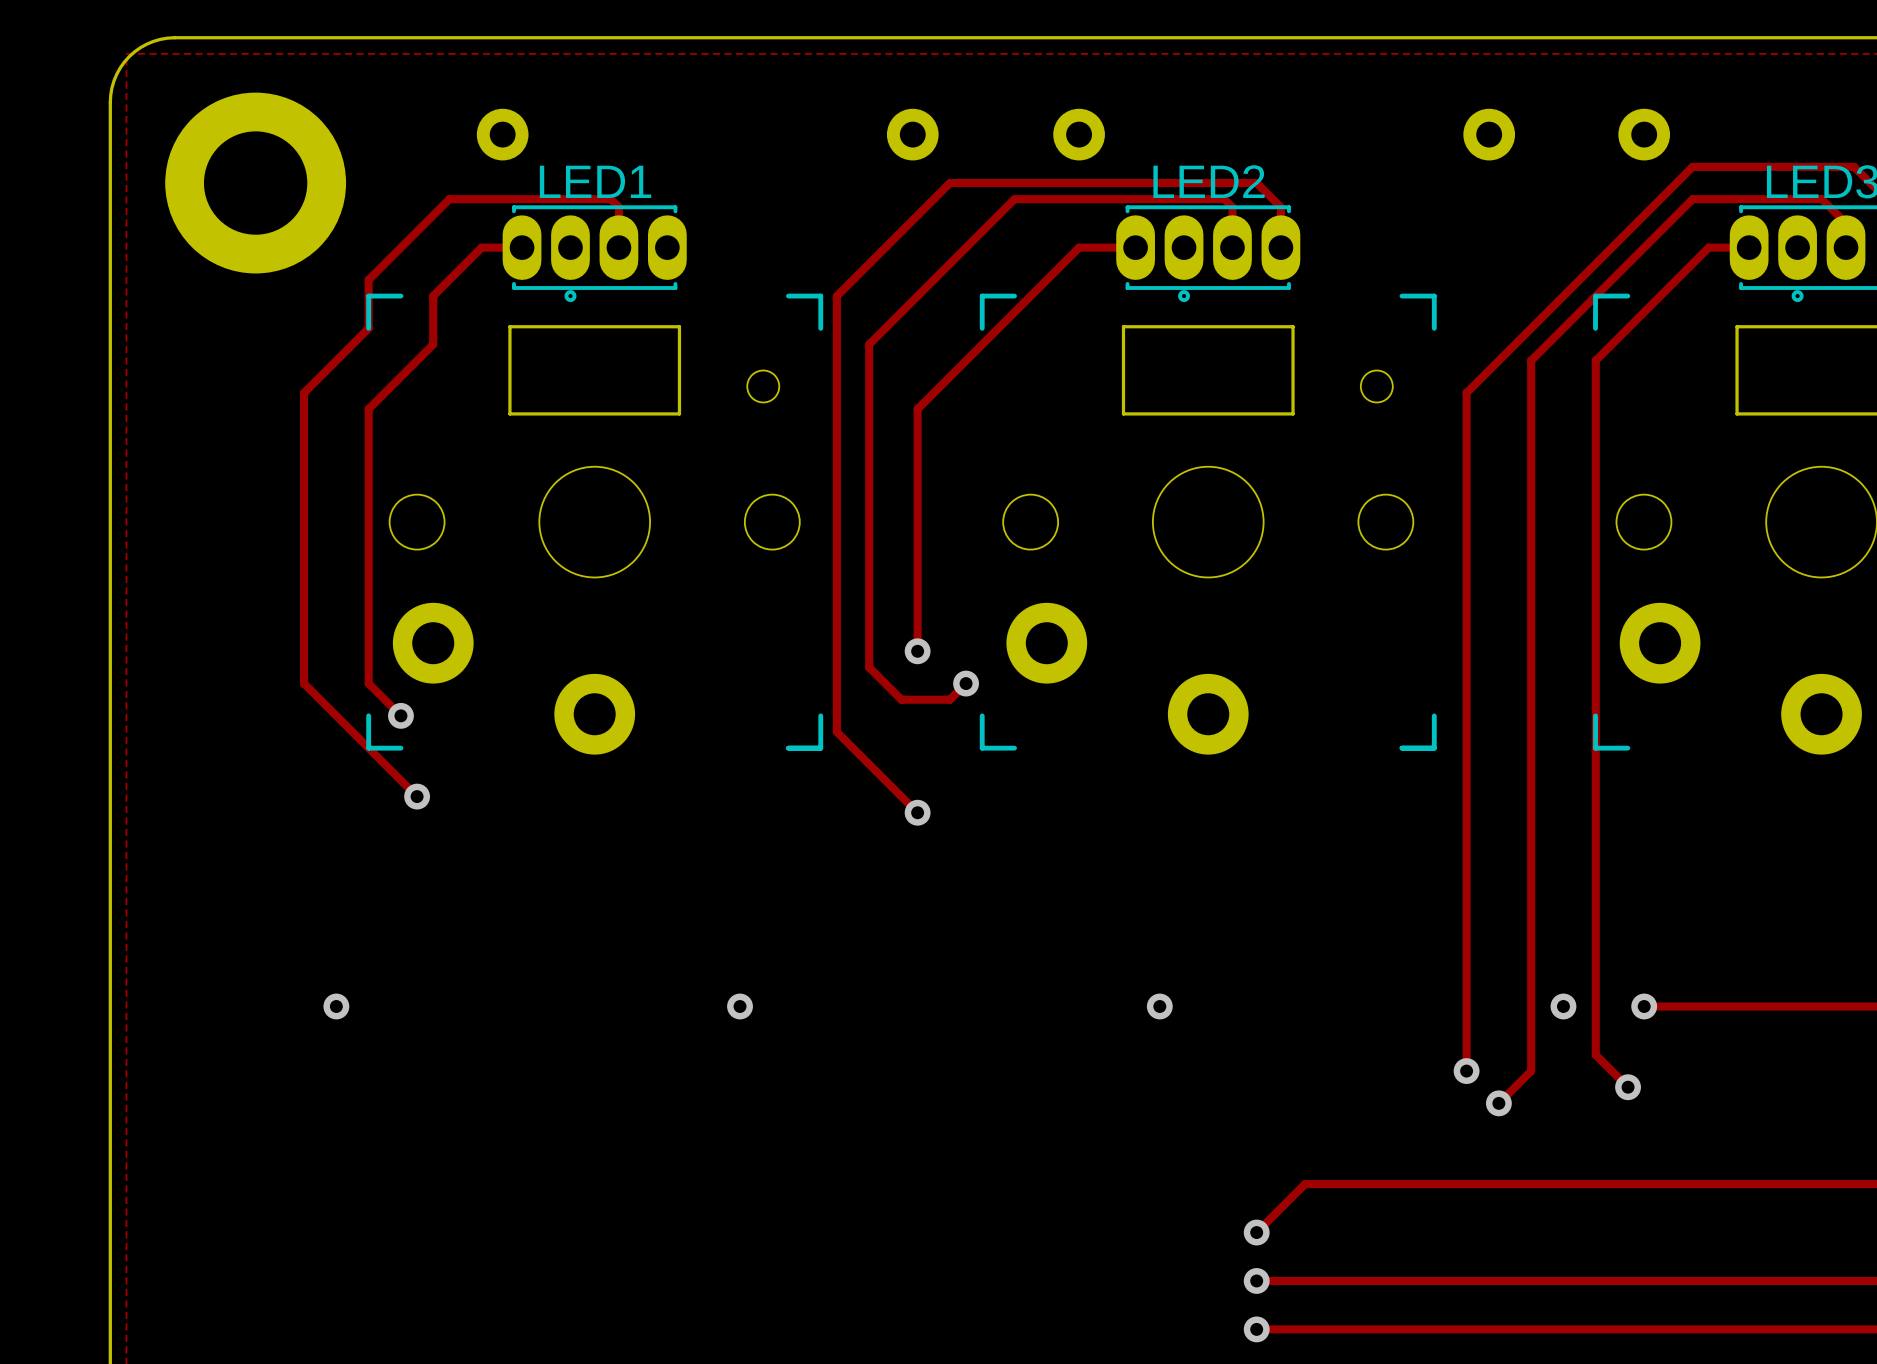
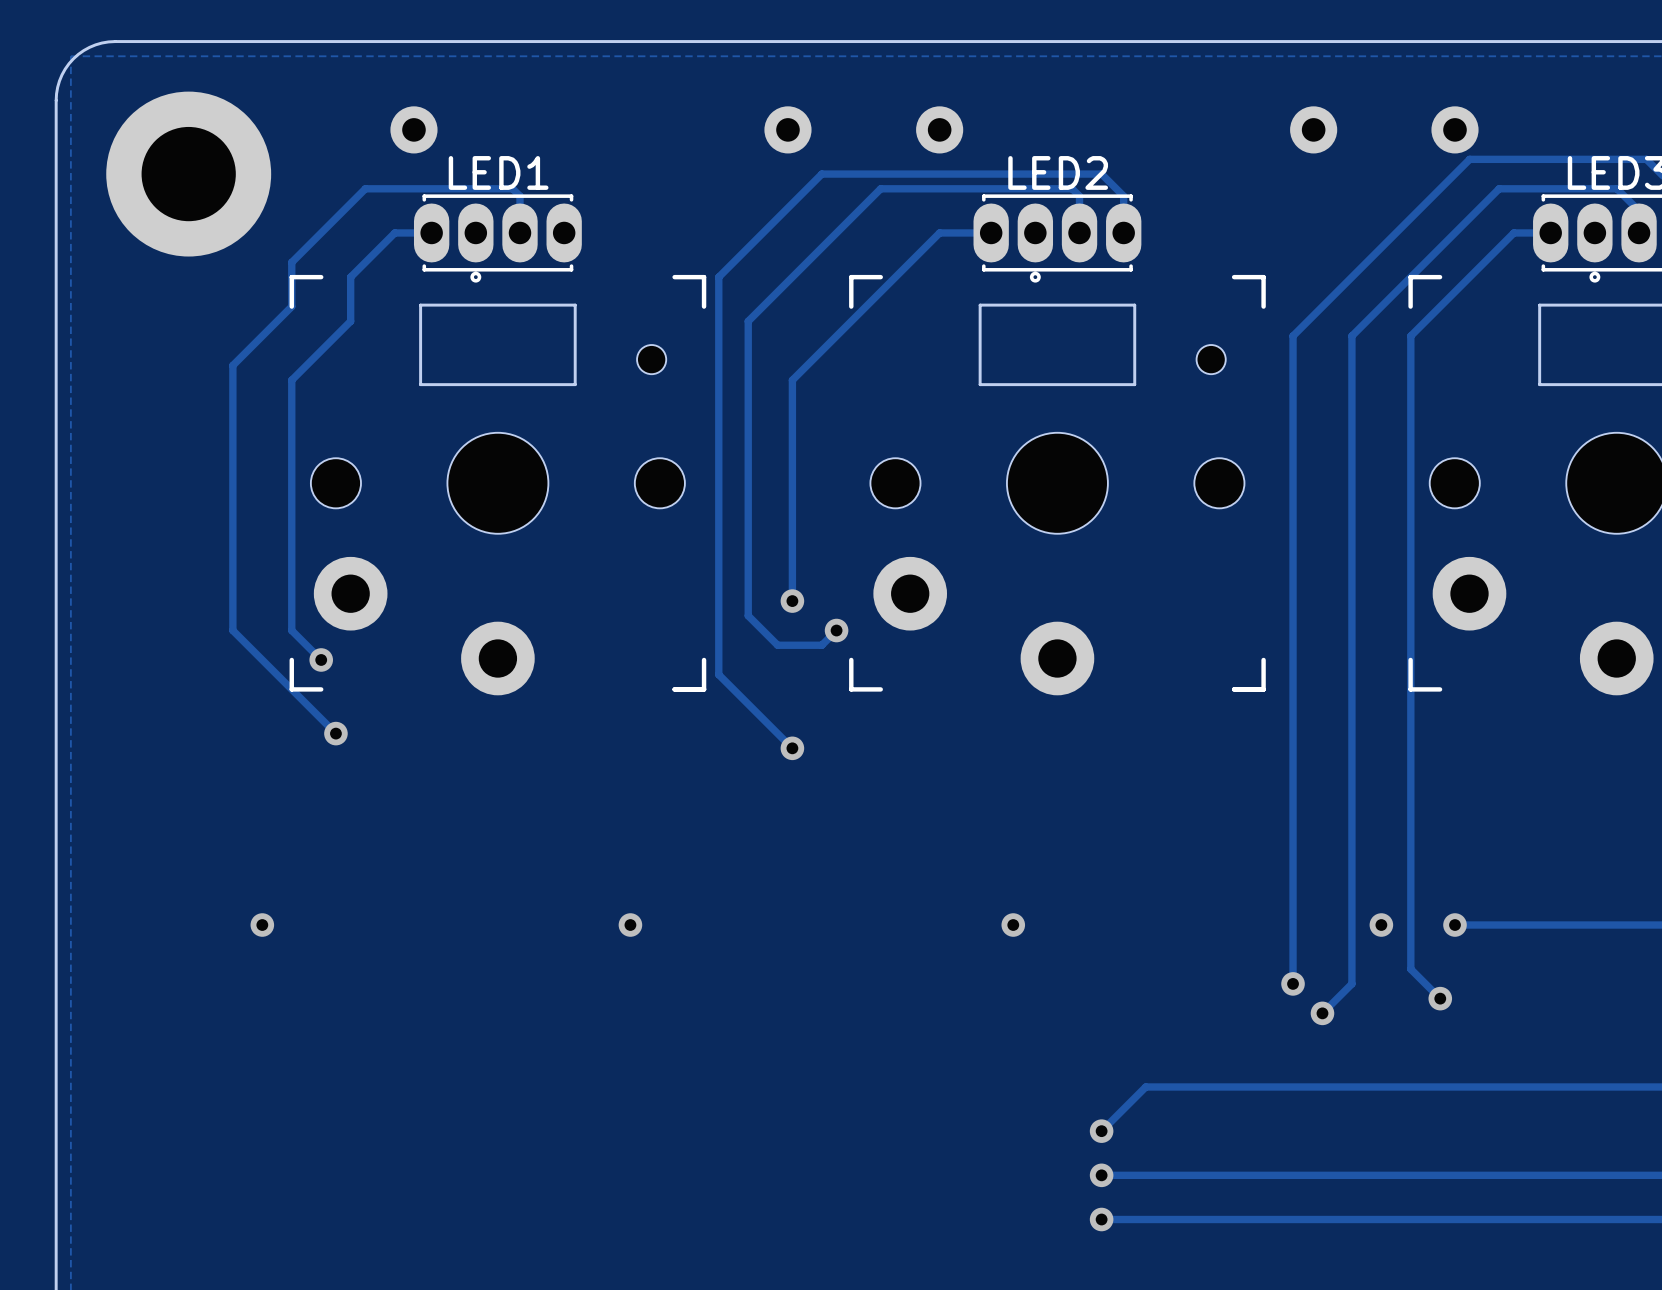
track: (1692, 166) (1466, 392) -> (1499, 159) (1469, 159) (1293, 336) (1293, 365)

